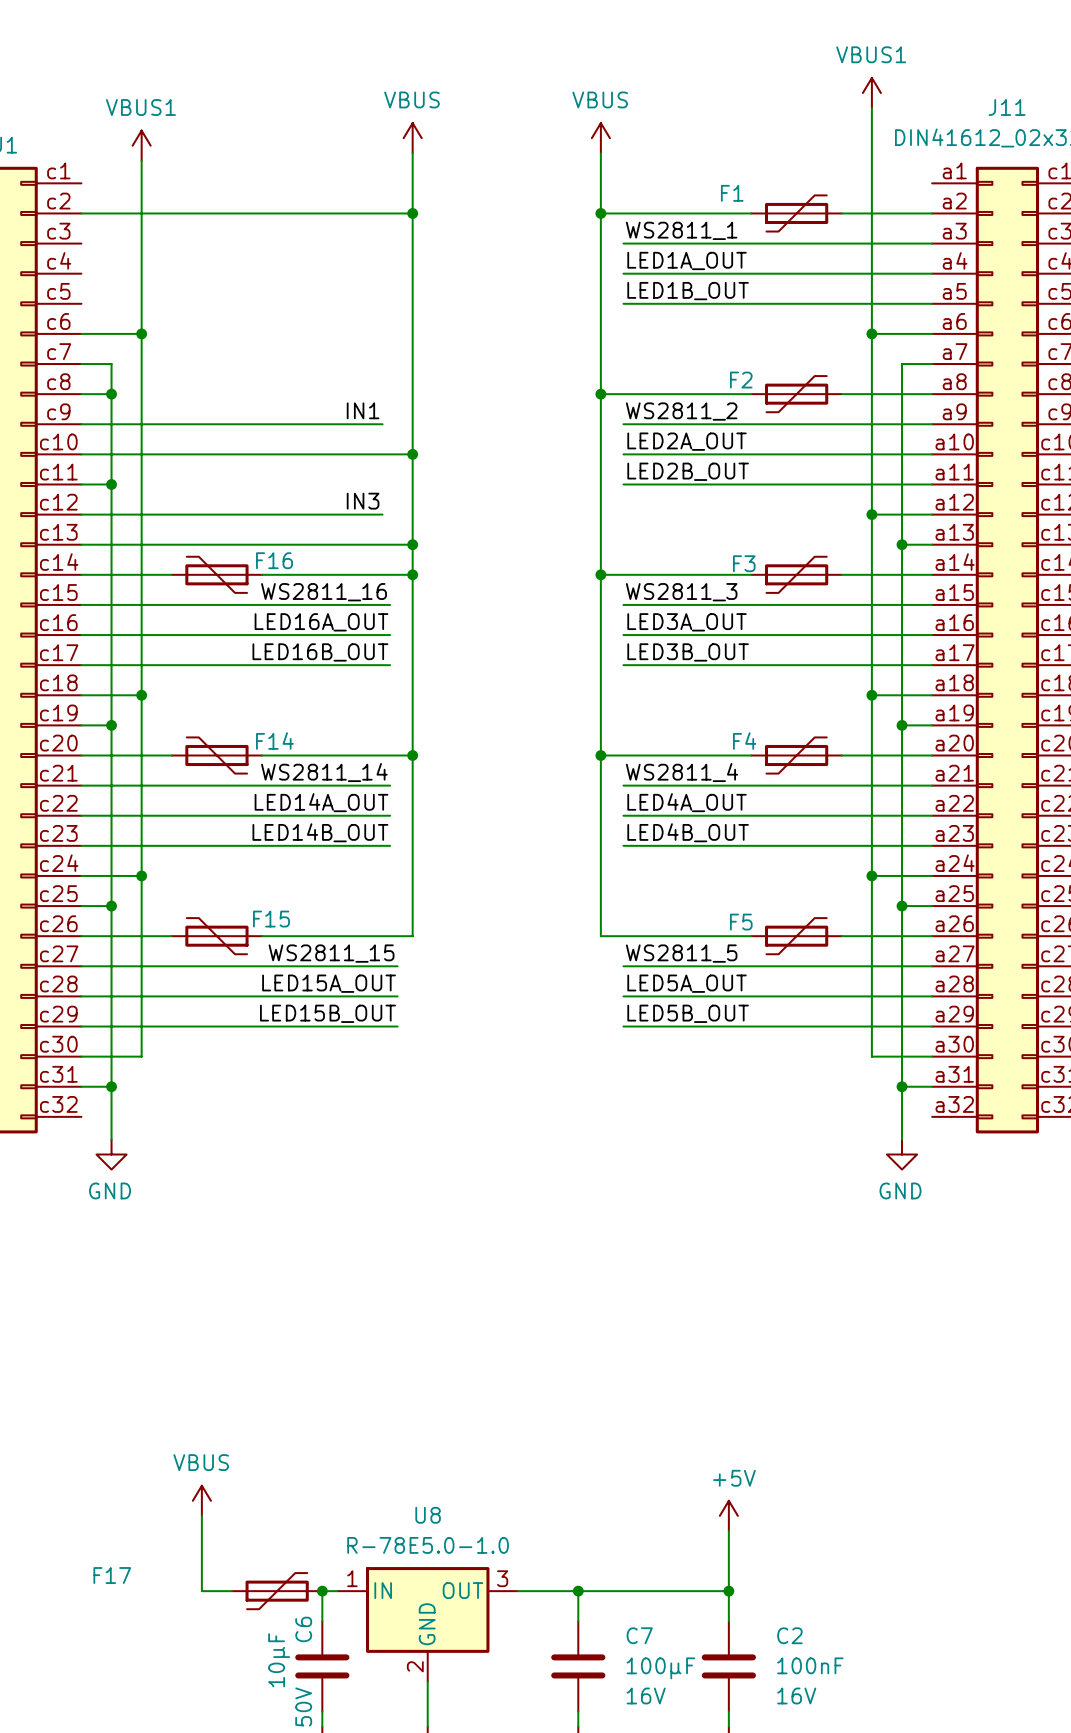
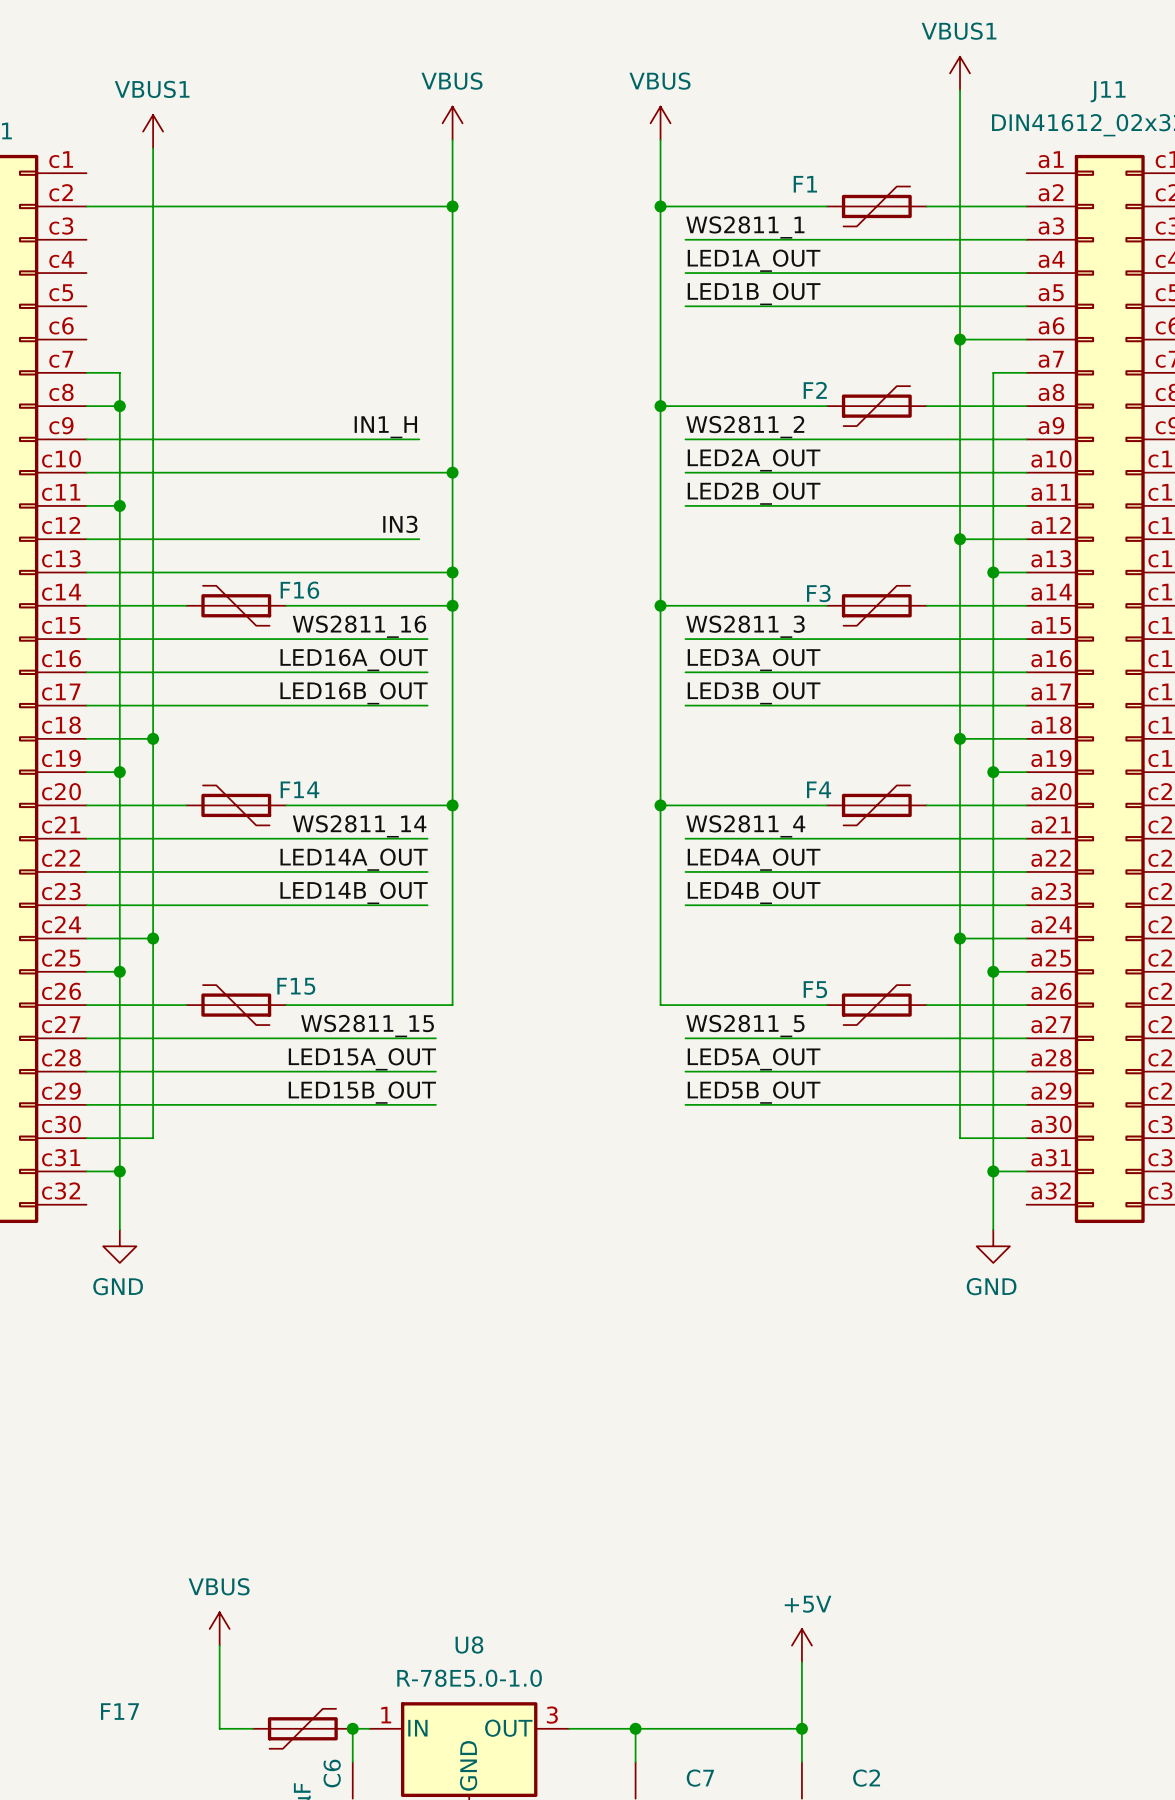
wire: (81, 333) (141, 333) -> none
junction: (141, 333) -> none
label: IN1 (363, 410) -> IN1_H (385, 427)

